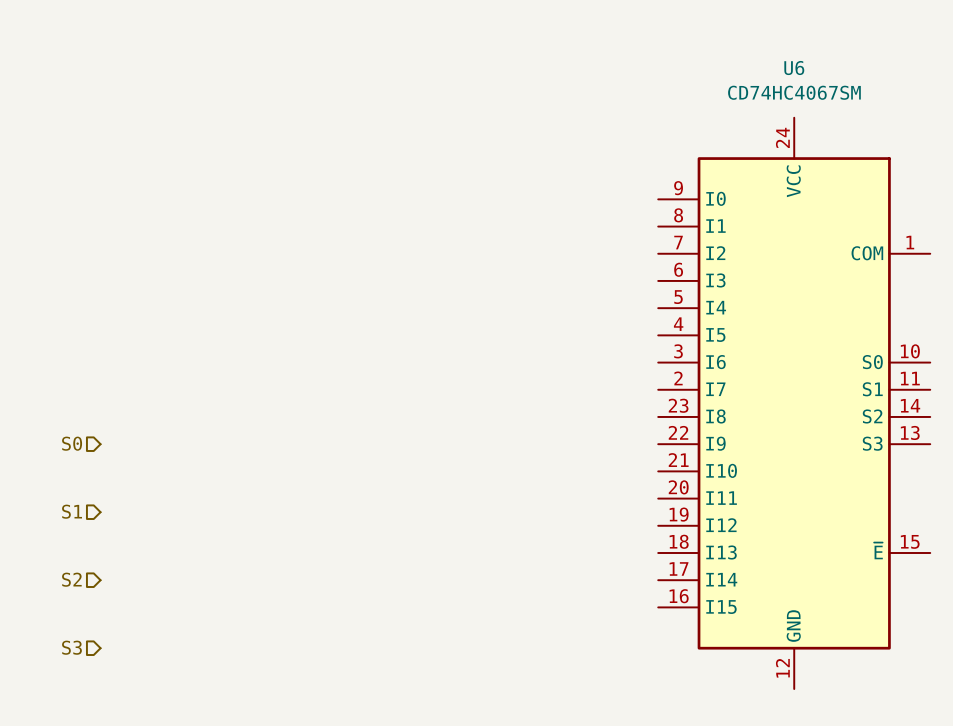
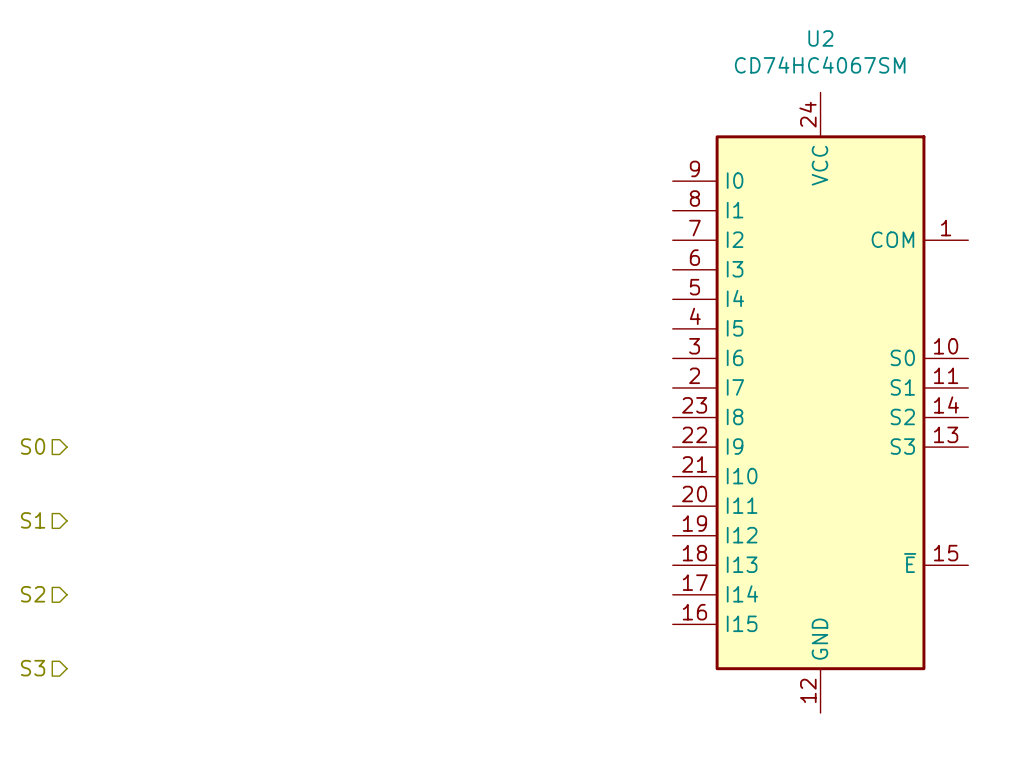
U6 name: U6 (794, 68) -> U2 (820, 38)

